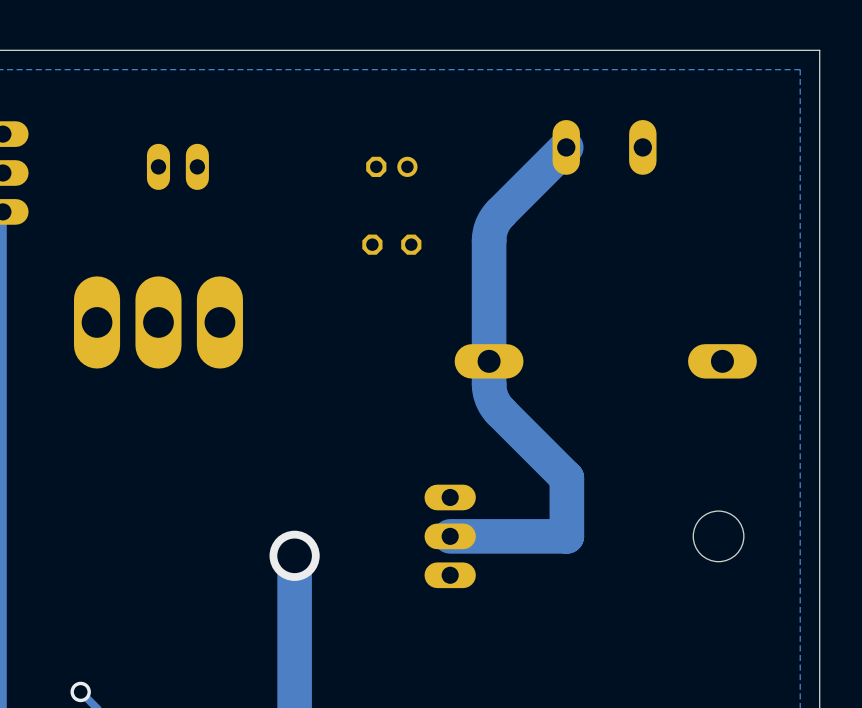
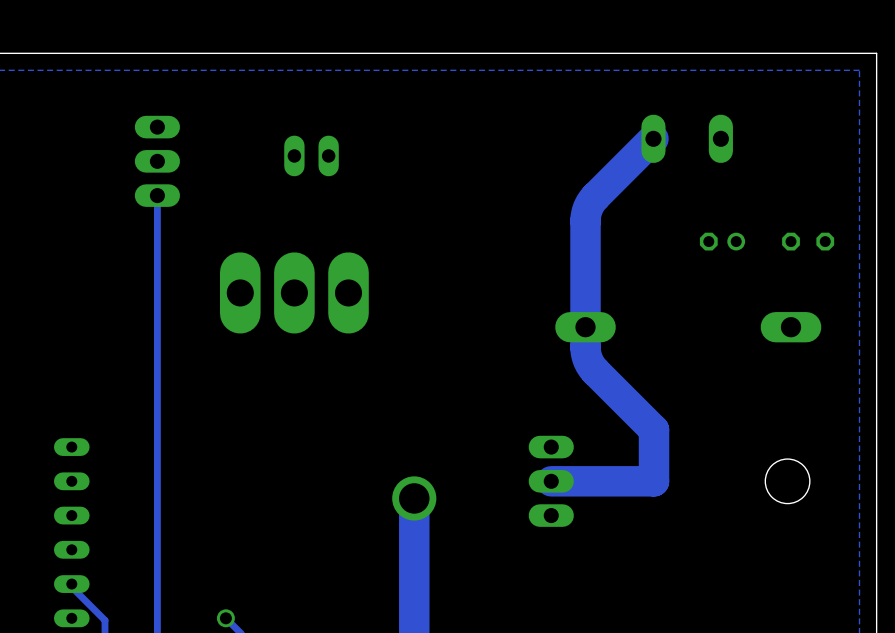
part position: (391, 166) -> (722, 241)
part position: (391, 244) -> (808, 241)

